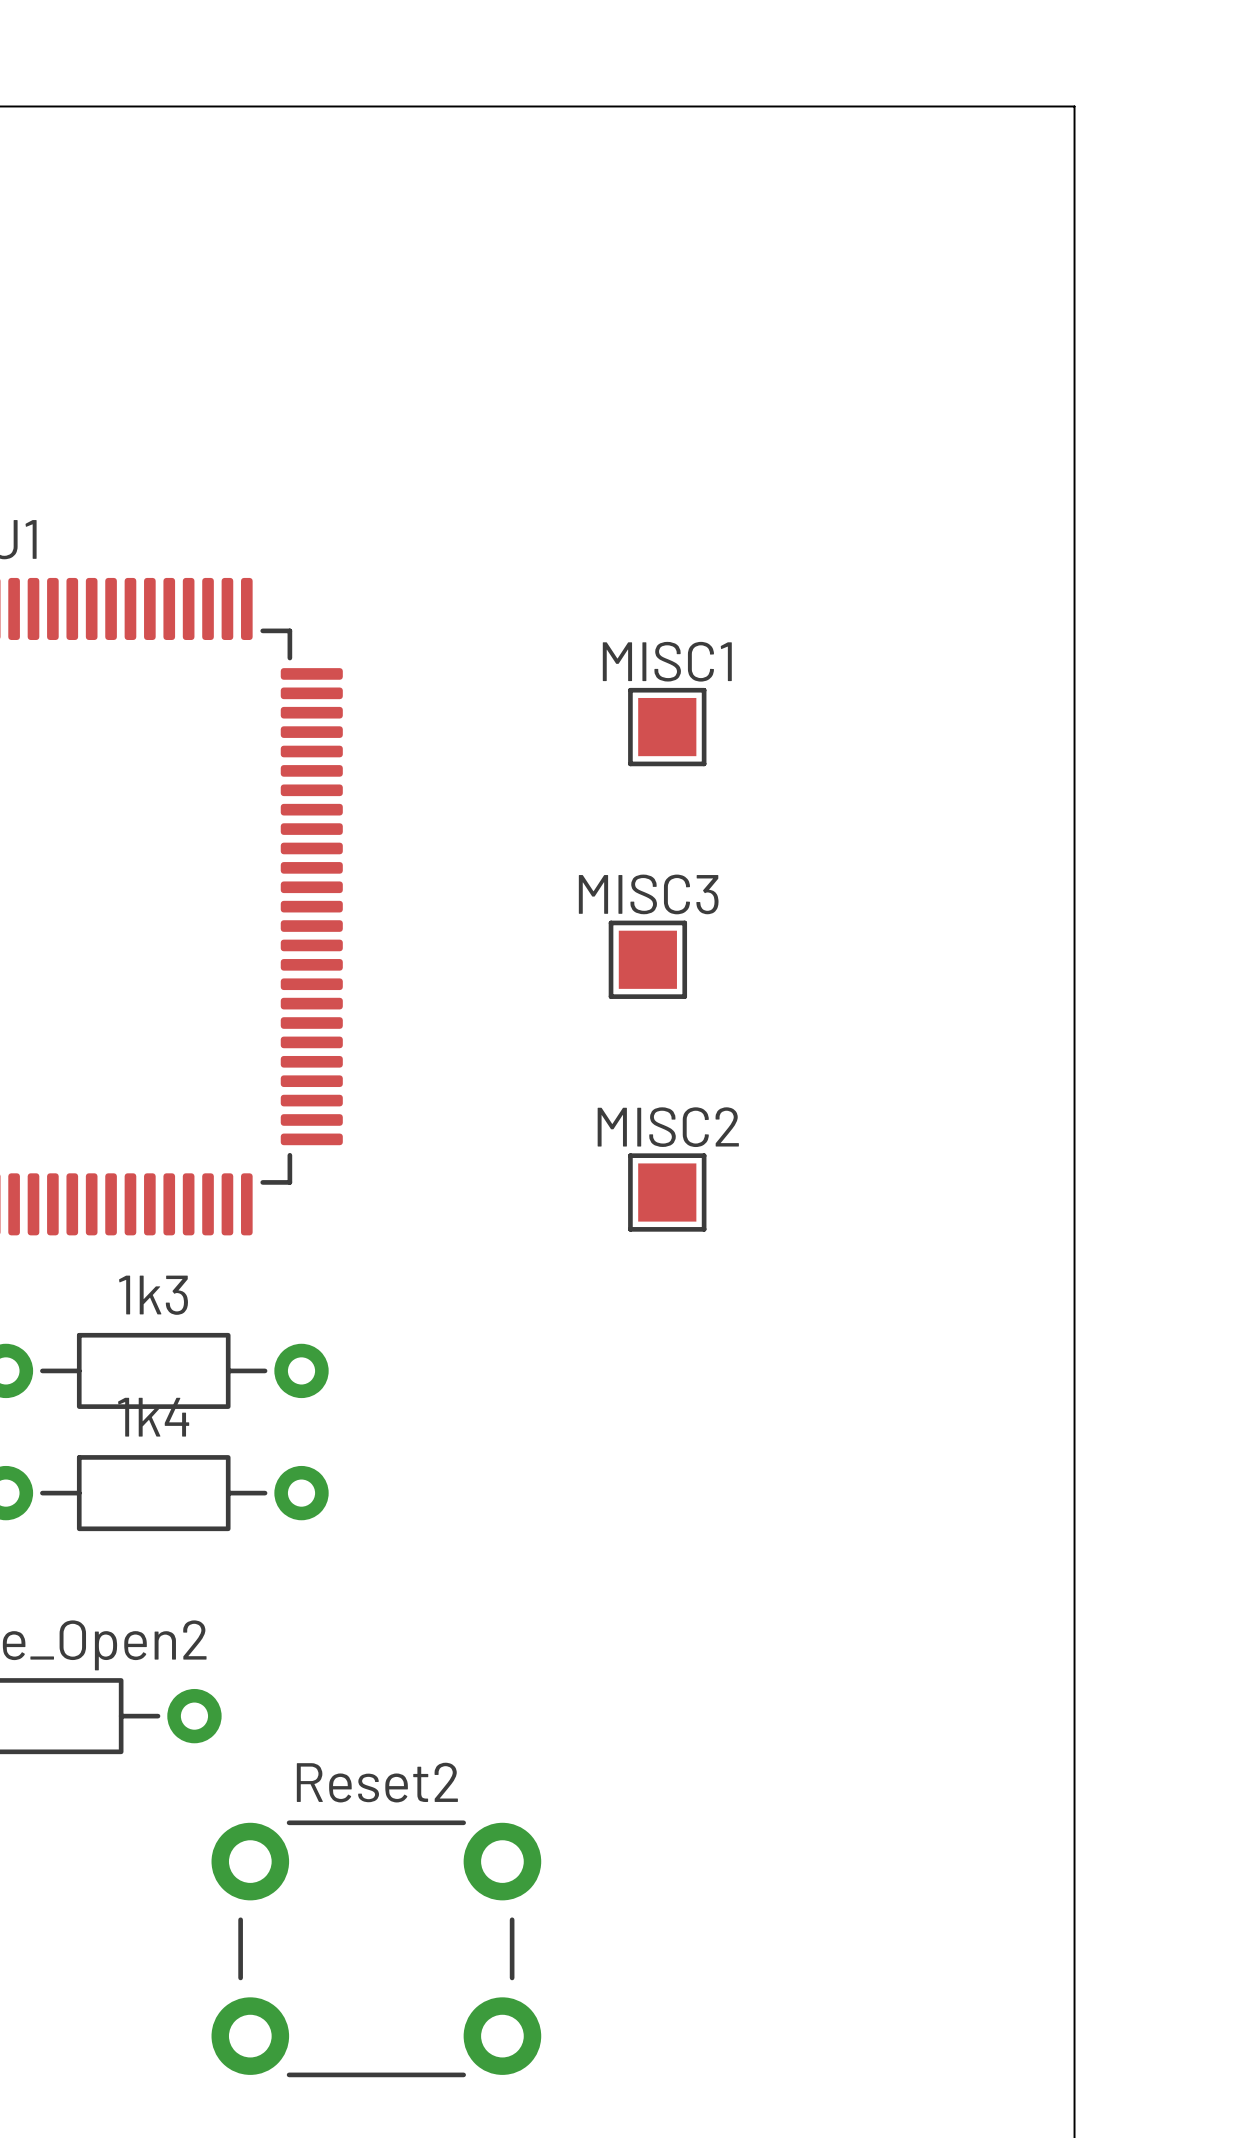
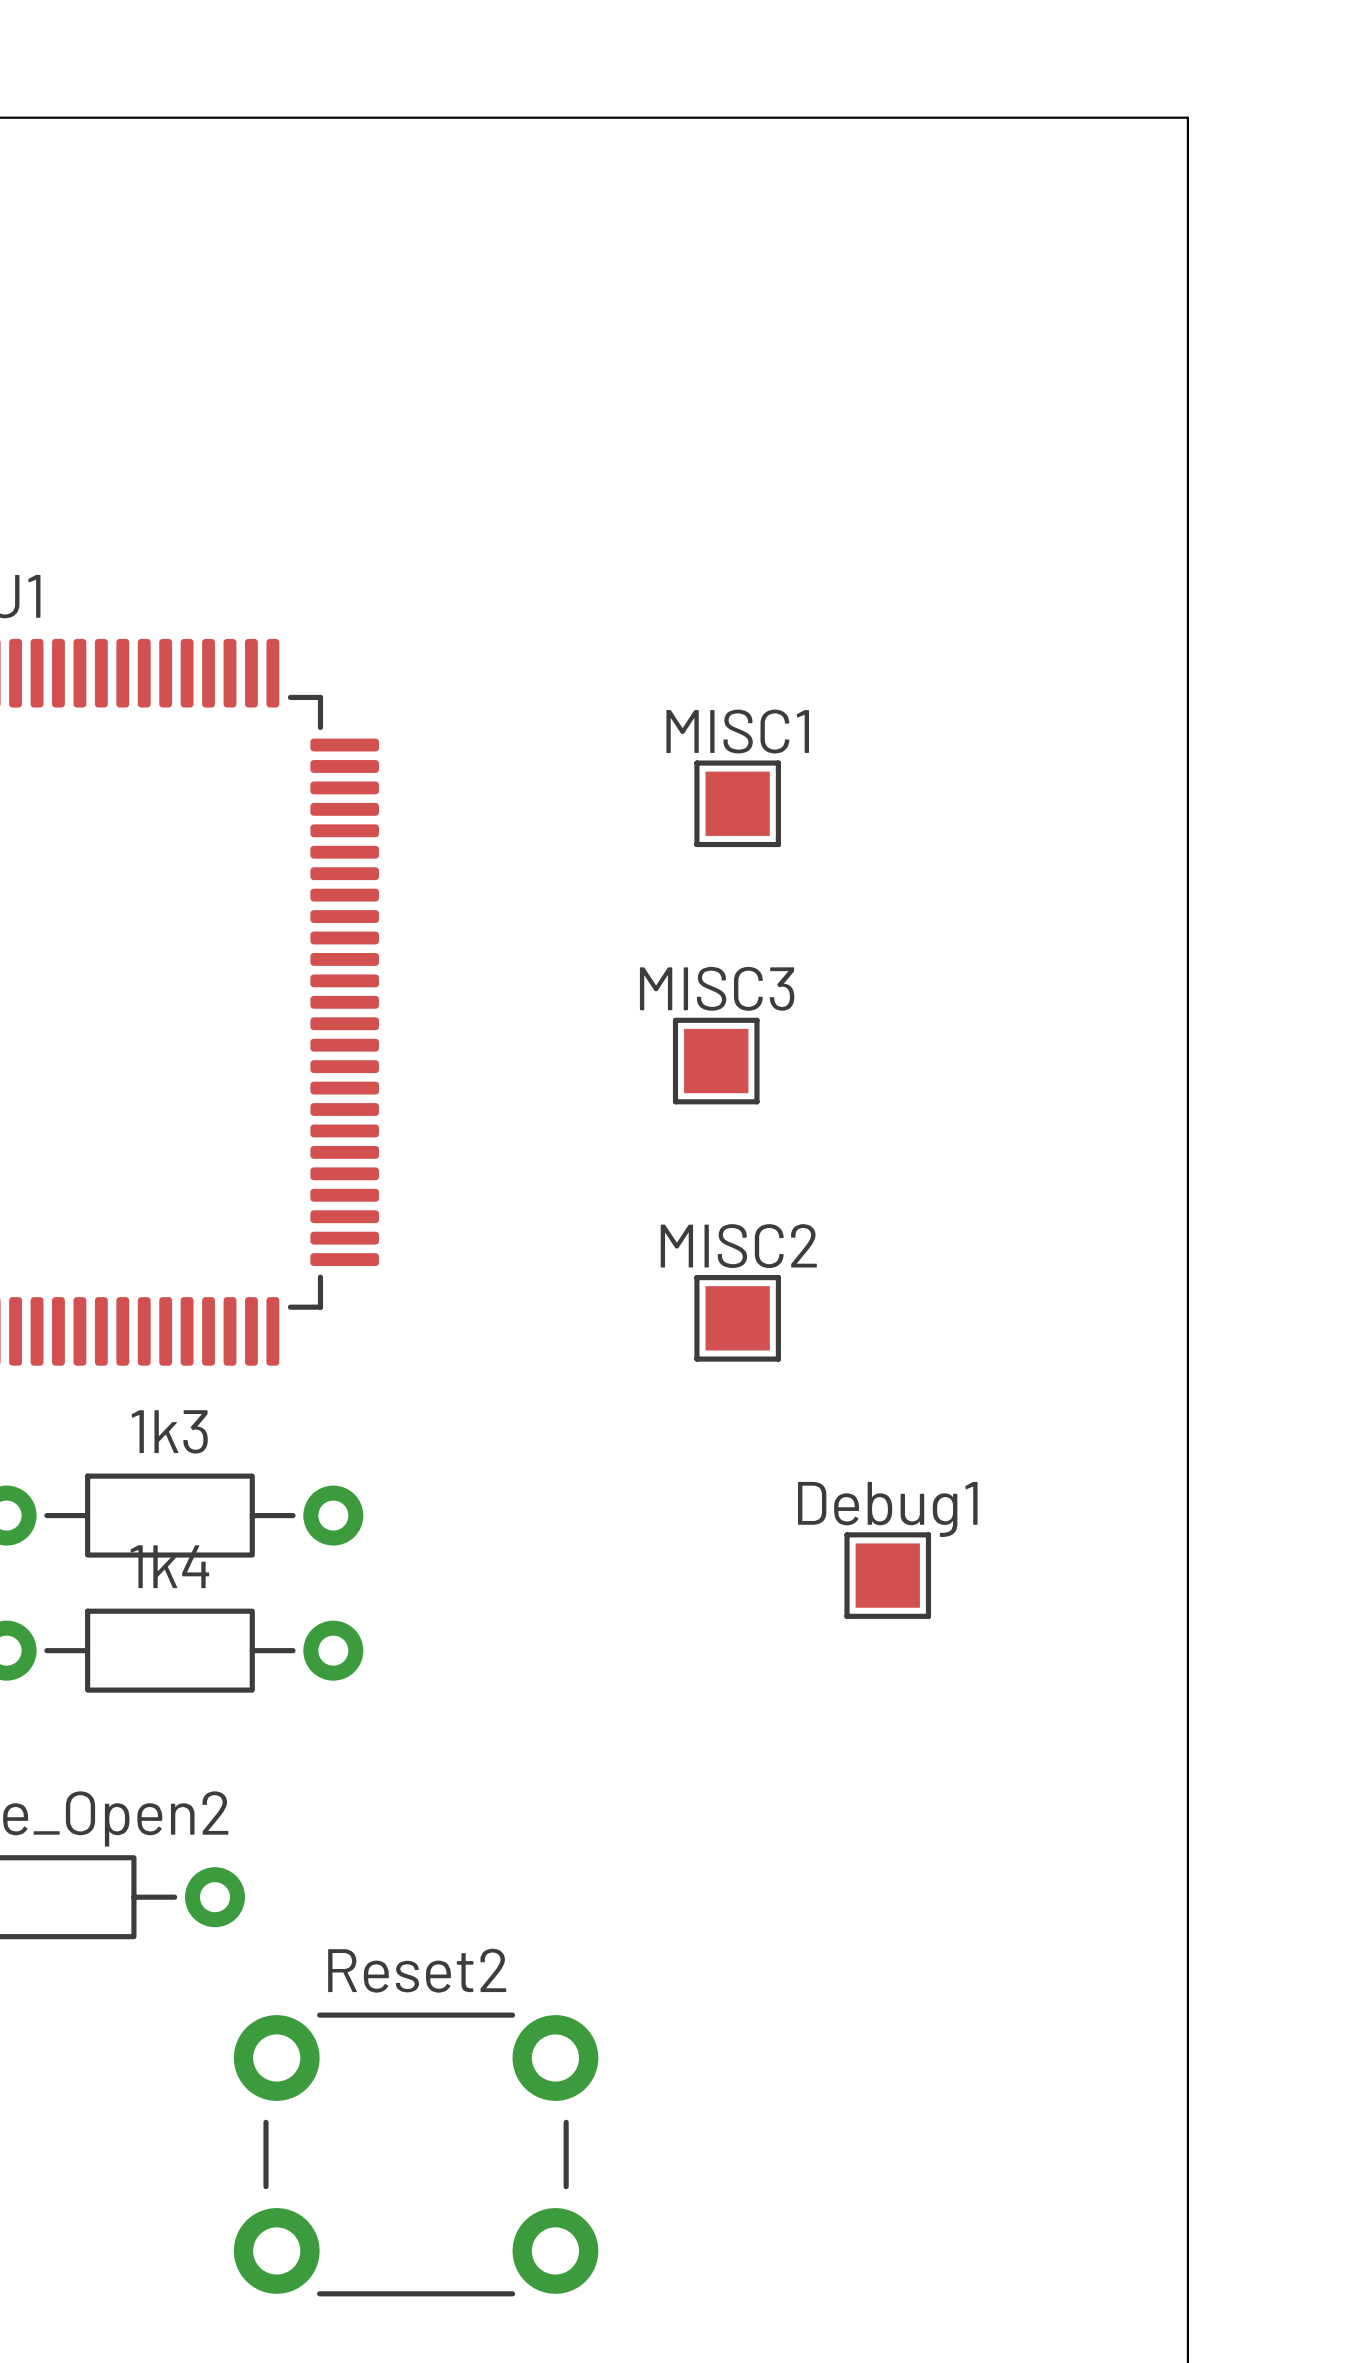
Debug1: none -> (887, 1575)

